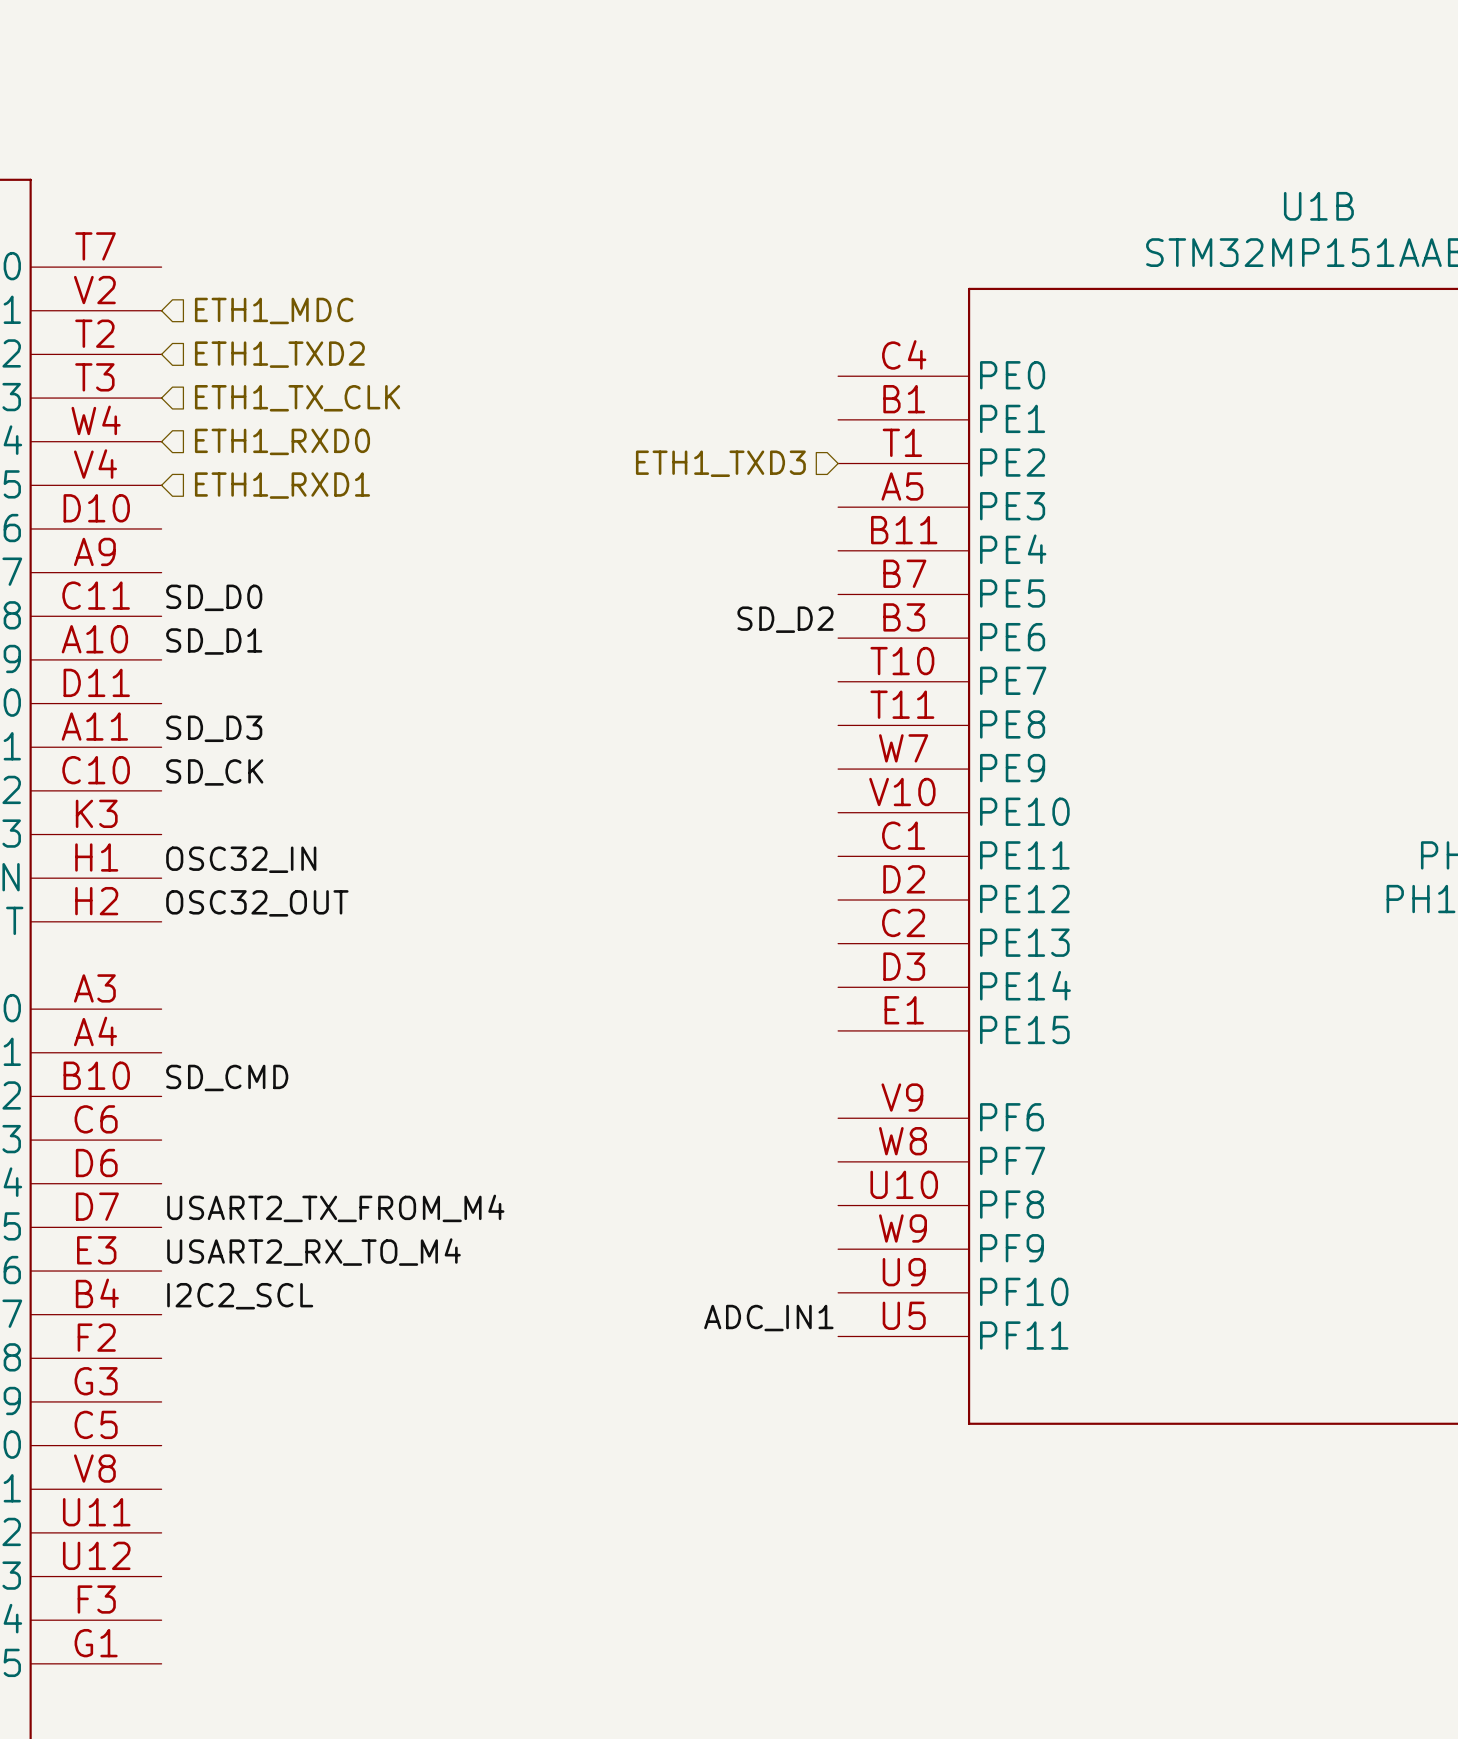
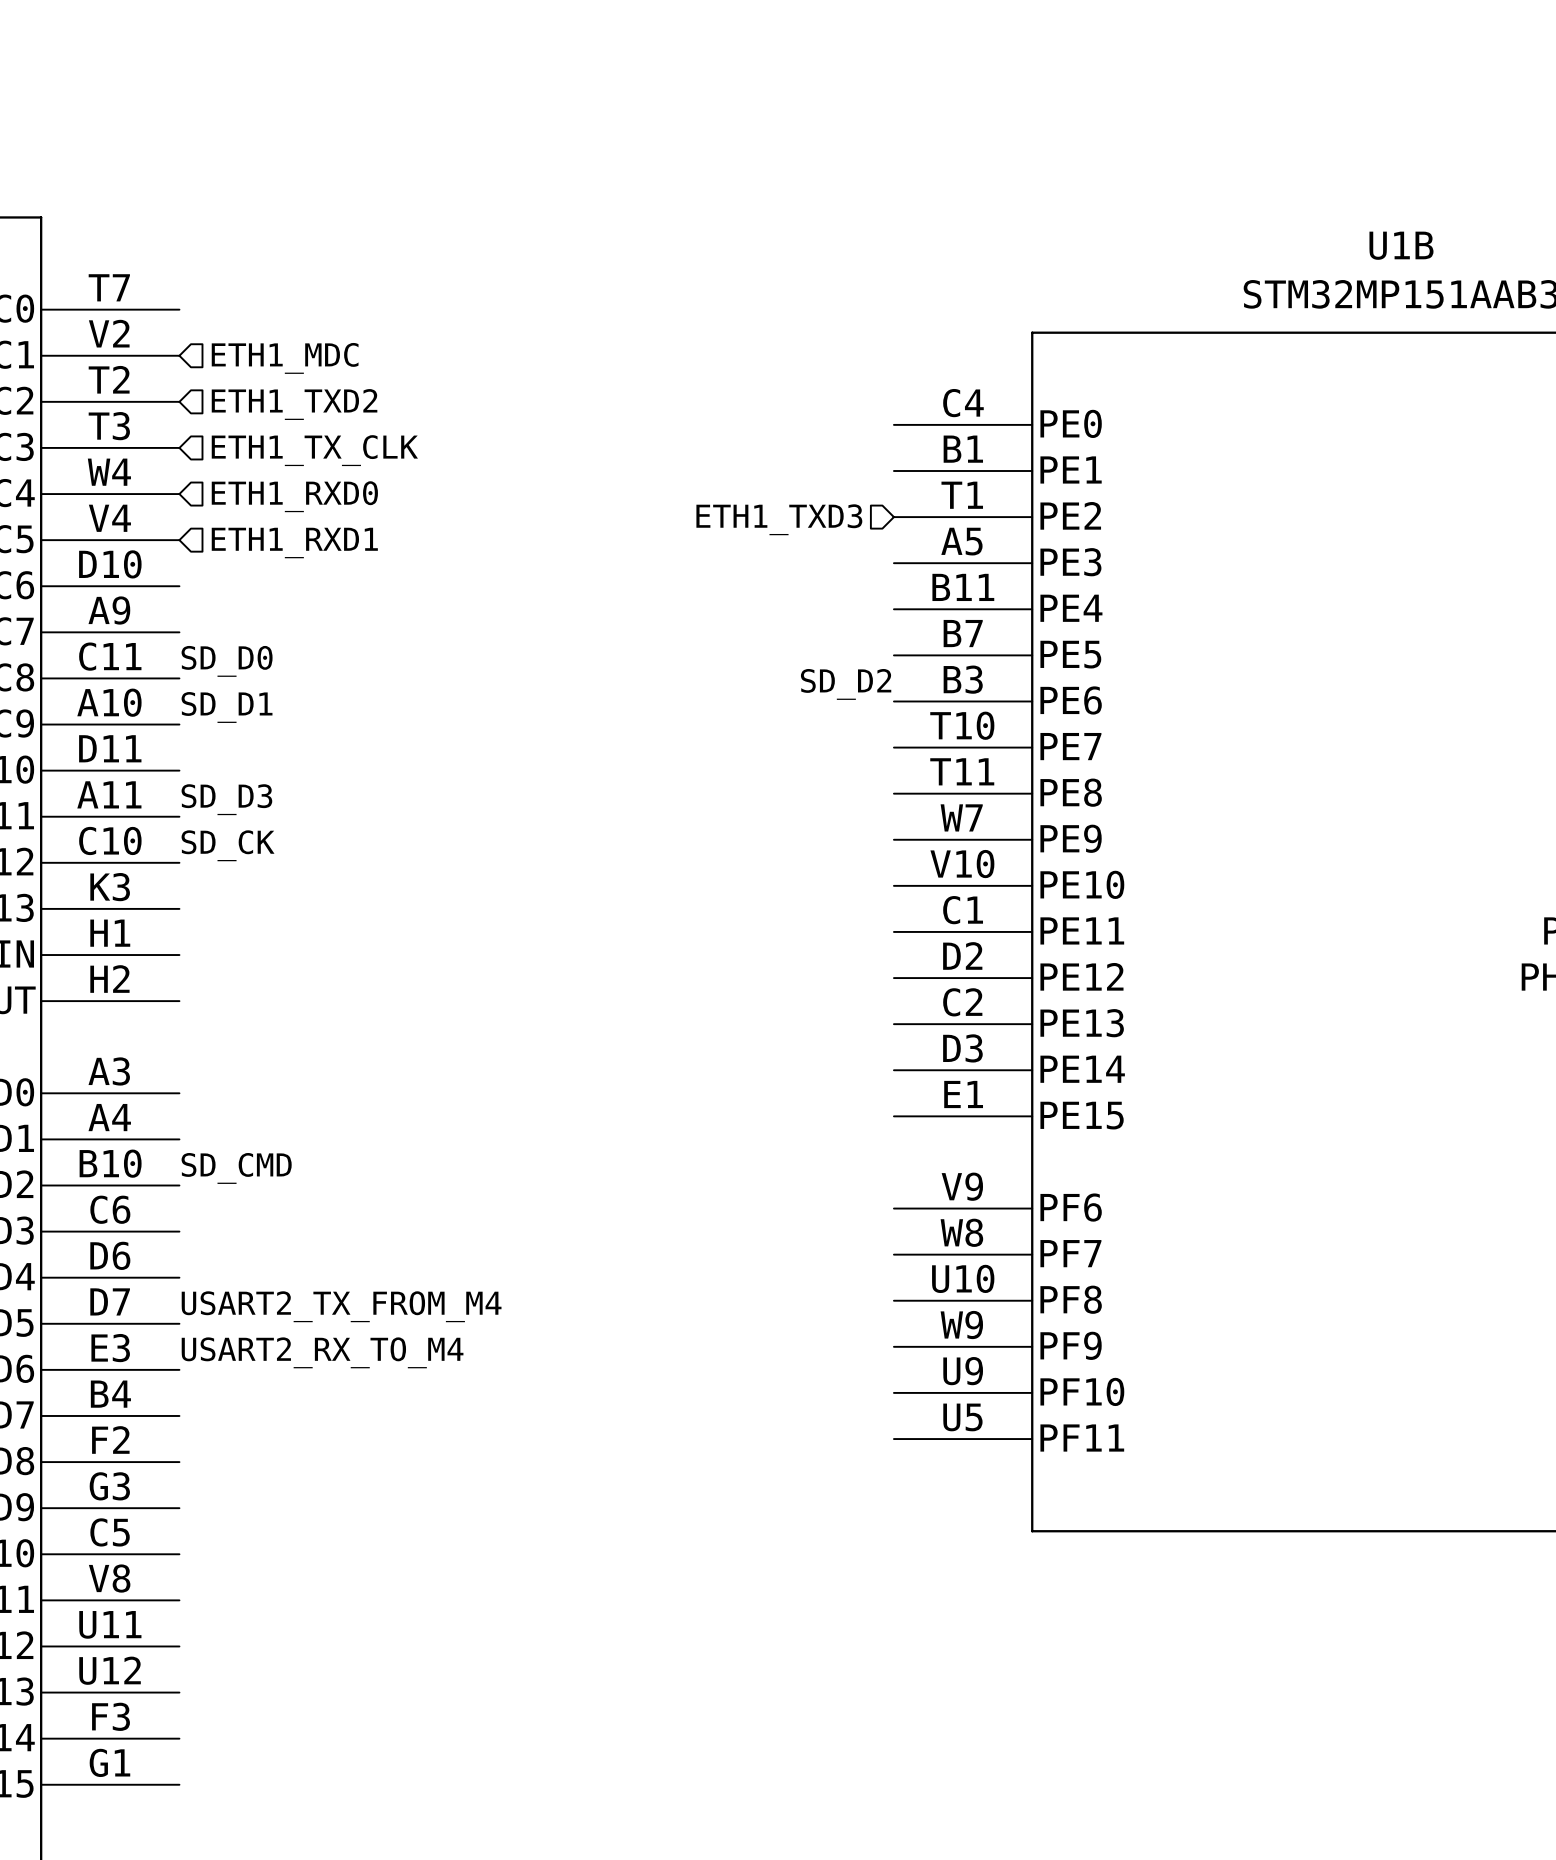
label: OSC32_IN (241, 859) -> none
label: OSC32_OUT (257, 903) -> none
label: I2C2_SCL (240, 1296) -> none
label: ADC_IN1 (768, 1318) -> none

